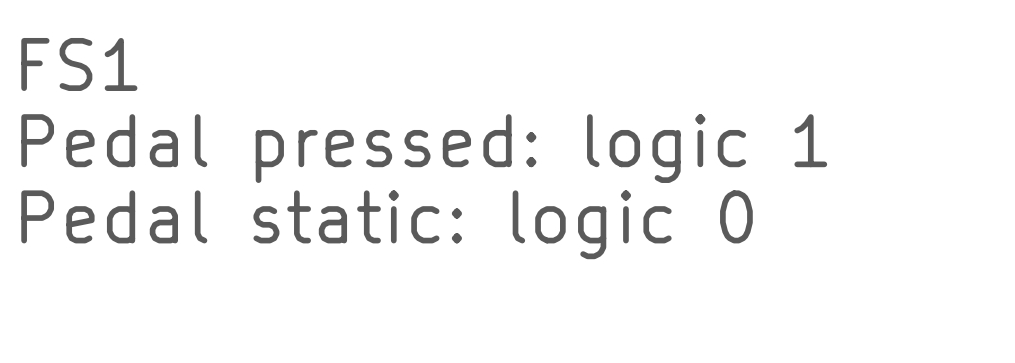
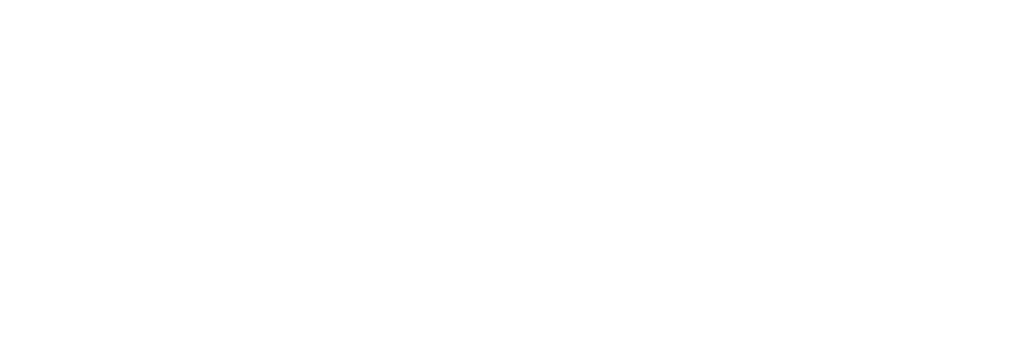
text: FS1 (79, 64) -> none
text: Pedal pressed: logic 1 (424, 148) -> none
text: Pedal static: logic 0 (387, 224) -> none

